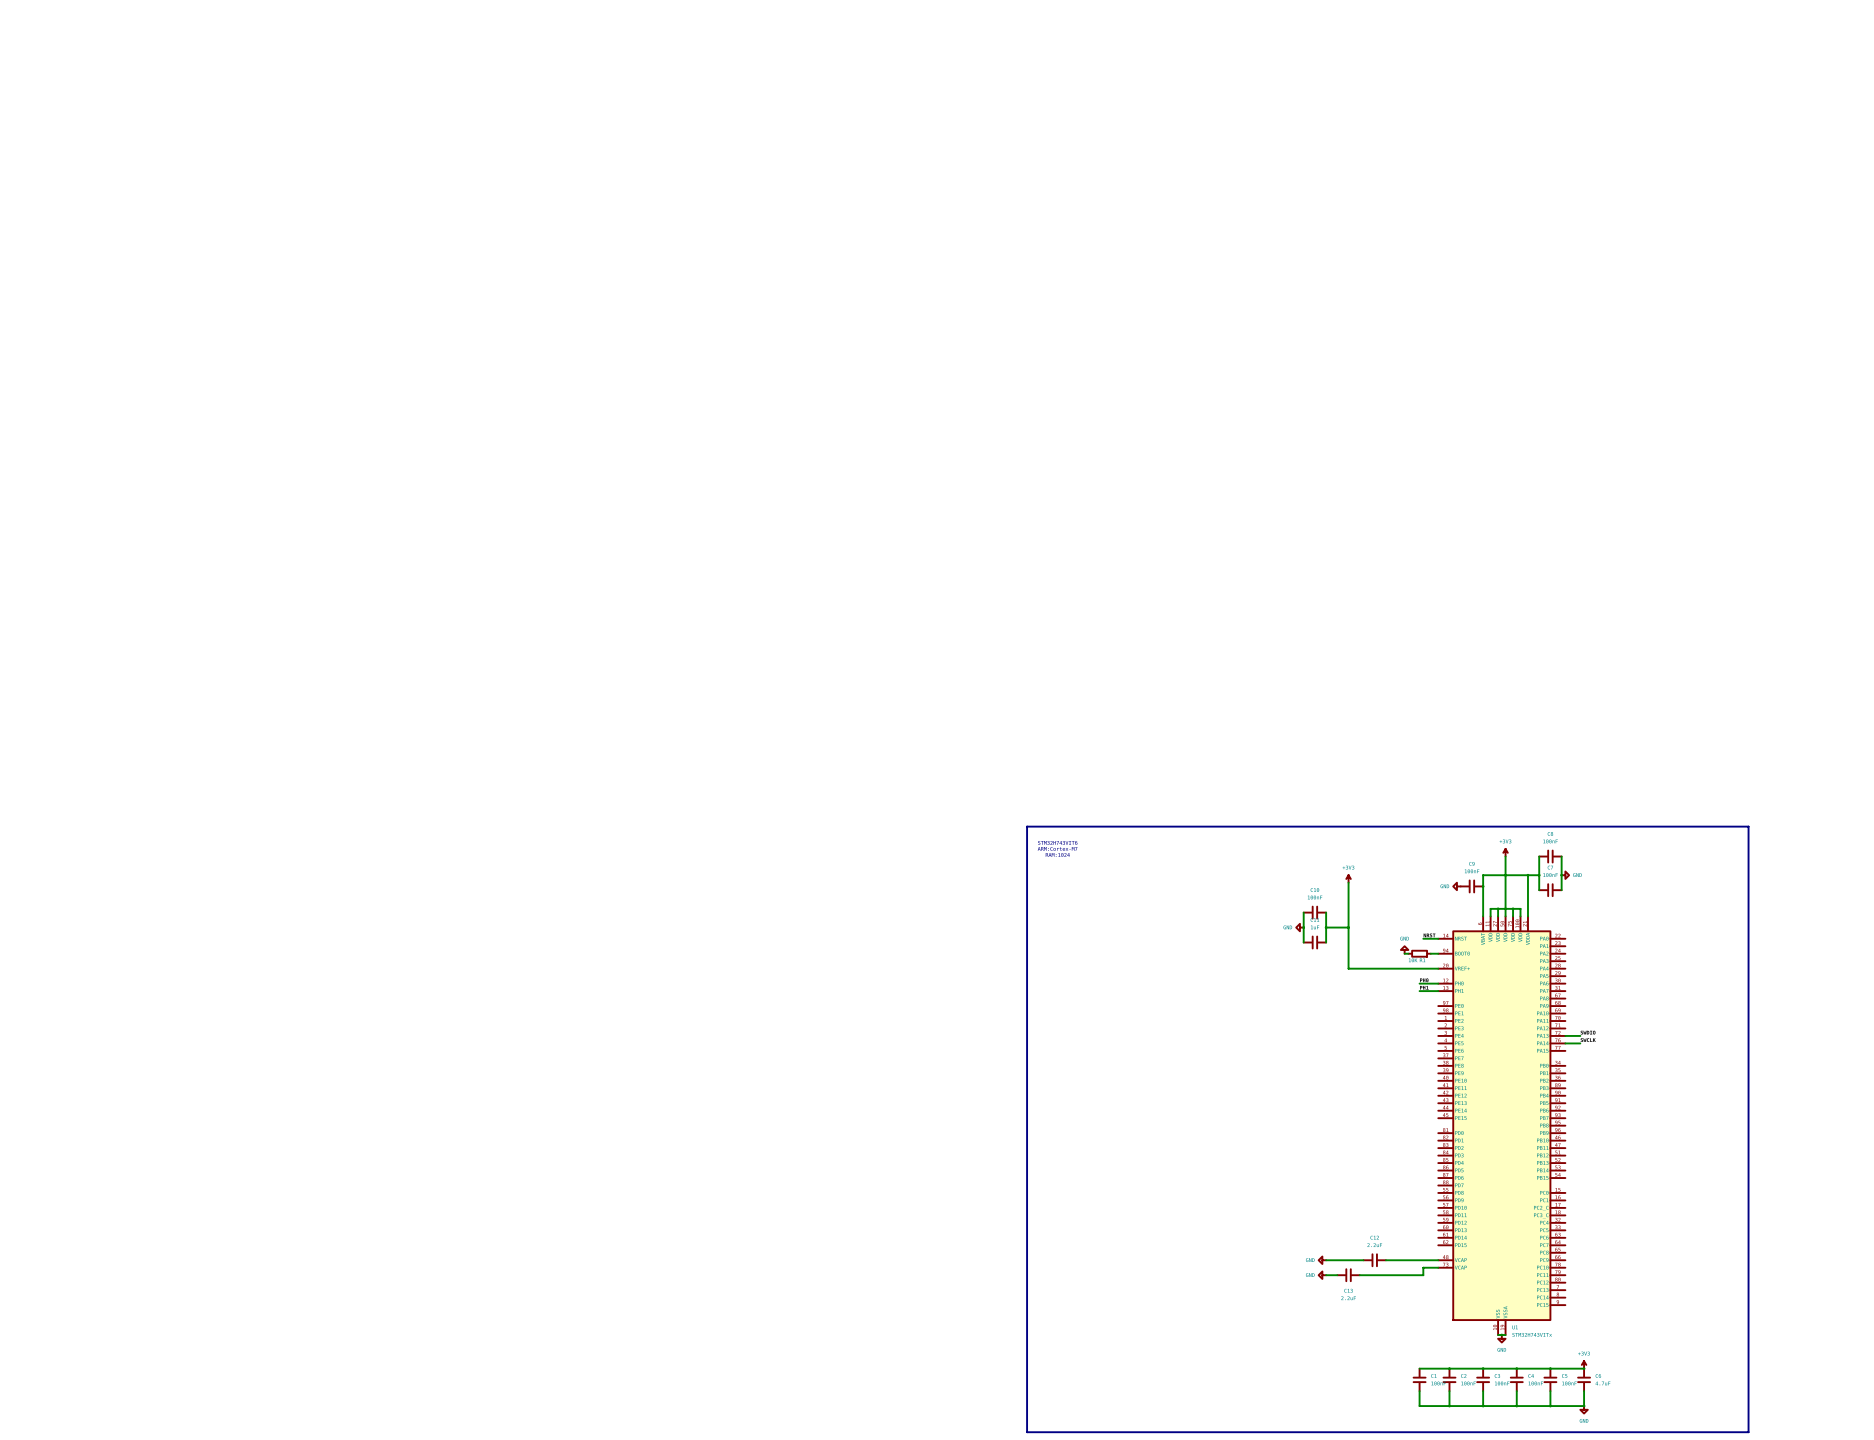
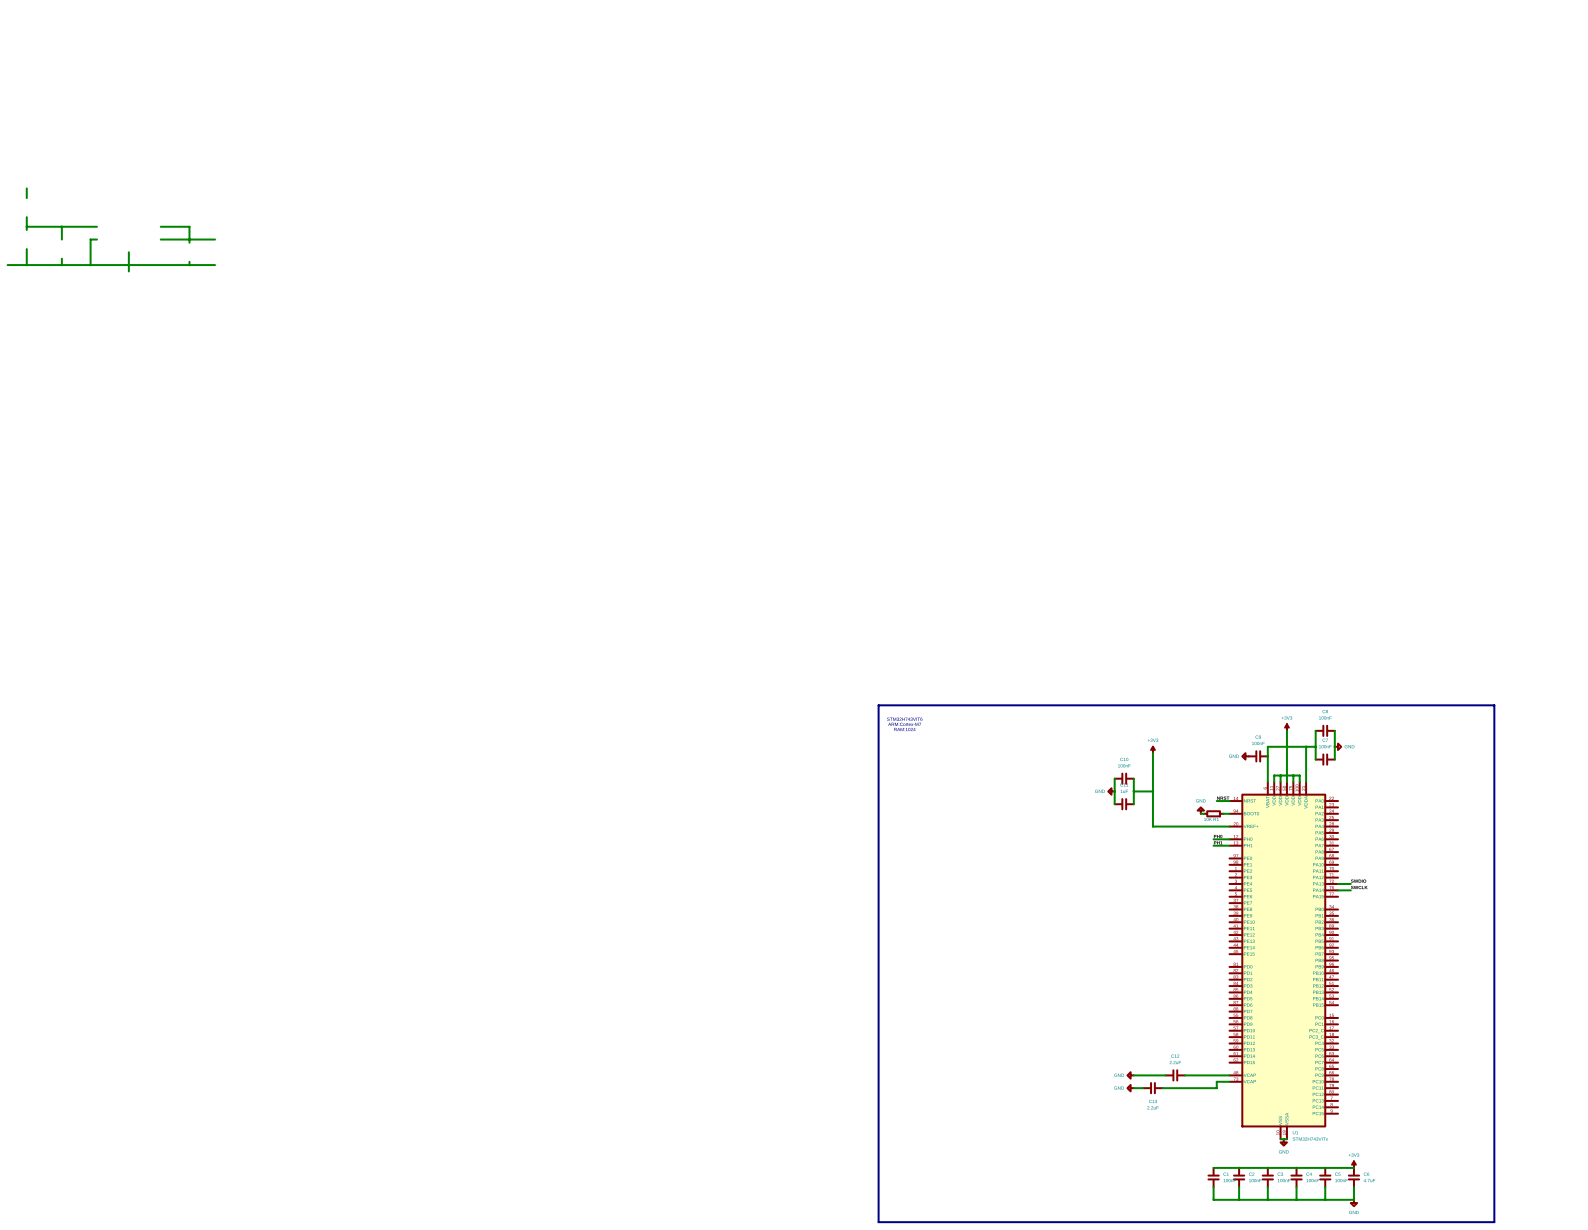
wire: none -> (26, 188) (26, 198)
wire: none -> (26, 217) (26, 229)
wire: none -> (26, 226) (96, 226)
wire: none -> (61, 226) (61, 239)
wire: none -> (160, 226) (189, 226) (189, 242)
wire: none -> (96, 239) (90, 239) (90, 265)
wire: none -> (160, 239) (215, 239)
wire: none -> (26, 249) (26, 265)
wire: none -> (128, 252) (128, 271)
wire: none -> (61, 258) (61, 265)
wire: none -> (189, 261) (189, 265)
wire: none -> (7, 265) (215, 265)

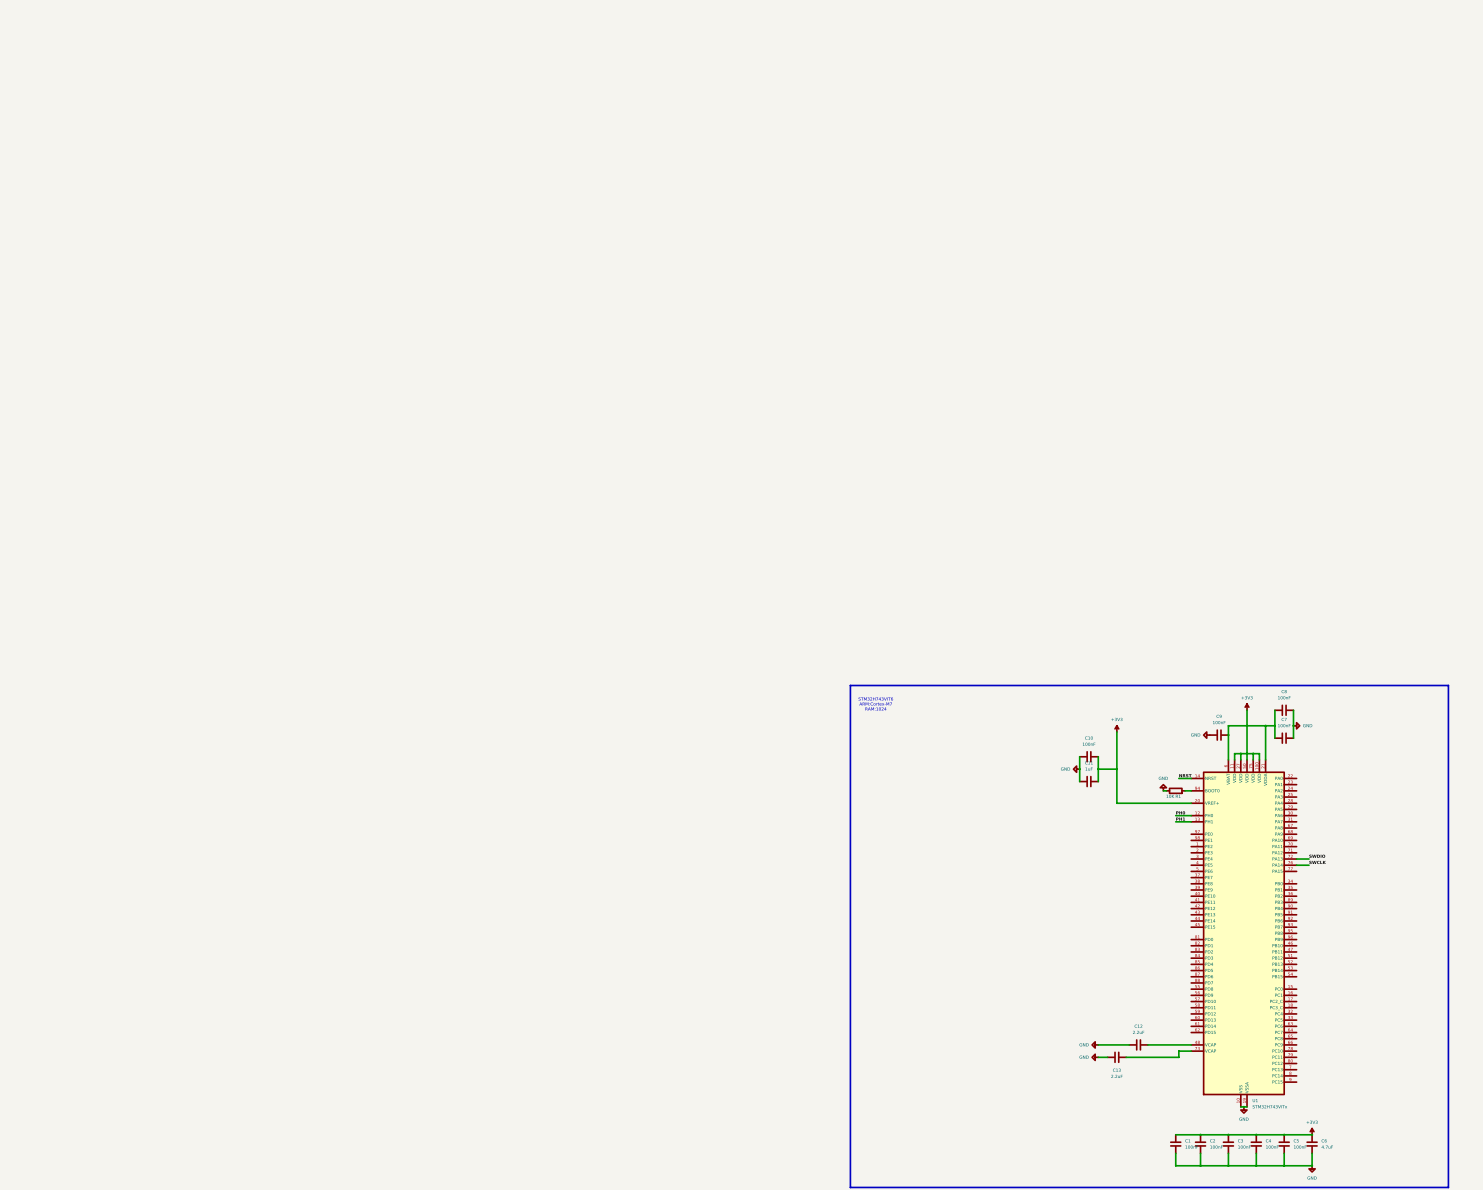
wire: (26, 188) (26, 198) -> none
wire: (26, 217) (26, 229) -> none
wire: (26, 226) (96, 226) -> none
wire: (61, 226) (61, 239) -> none
wire: (160, 226) (189, 226) (189, 242) -> none
wire: (96, 239) (90, 239) (90, 265) -> none
wire: (160, 239) (215, 239) -> none
wire: (26, 249) (26, 265) -> none
wire: (128, 252) (128, 271) -> none
wire: (61, 258) (61, 265) -> none
wire: (189, 261) (189, 265) -> none
wire: (7, 265) (215, 265) -> none

